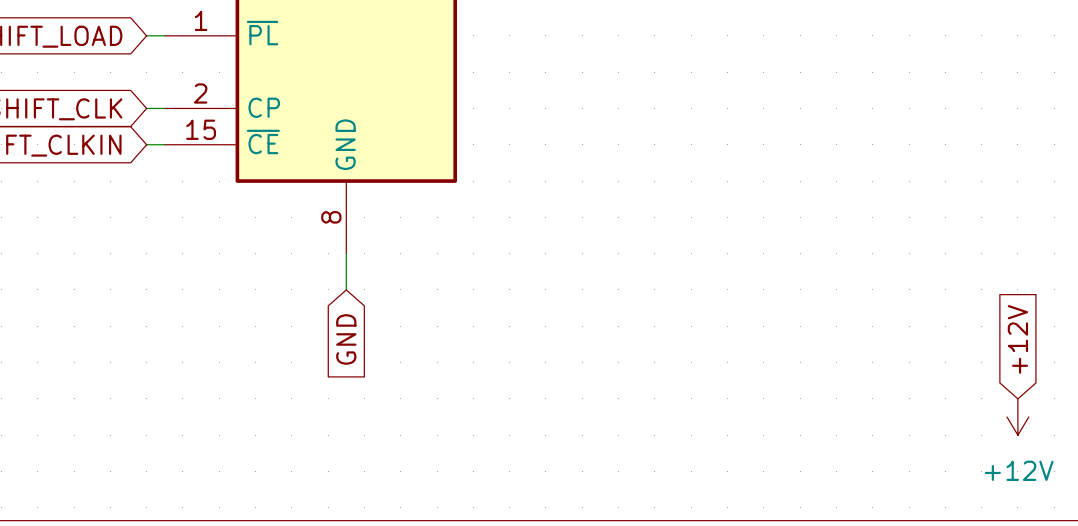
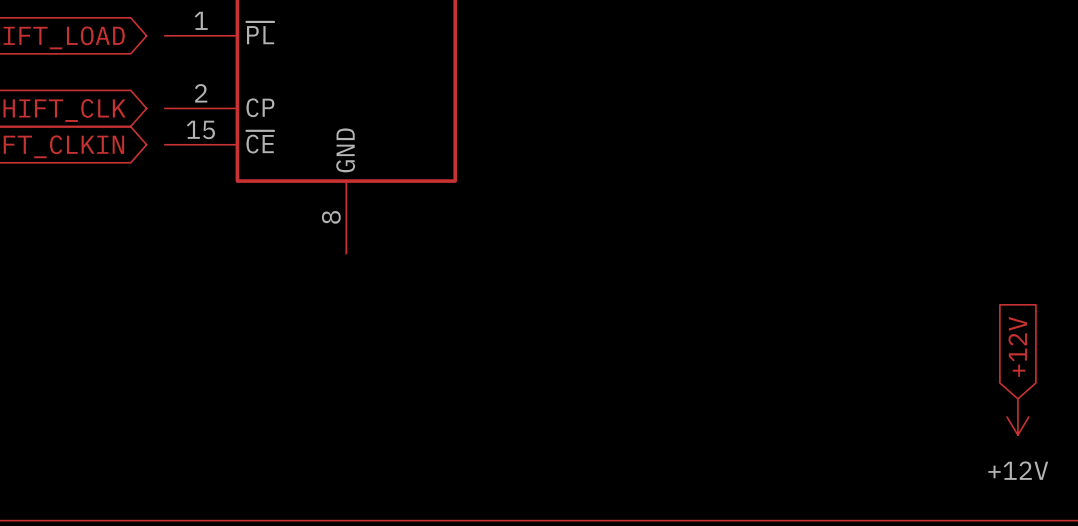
wire: (146, 35) (164, 35) -> none
wire: (146, 108) (164, 108) -> none
wire: (146, 144) (164, 144) -> none
wire: (346, 253) (346, 289) -> none
global label: GND (346, 339) -> none

